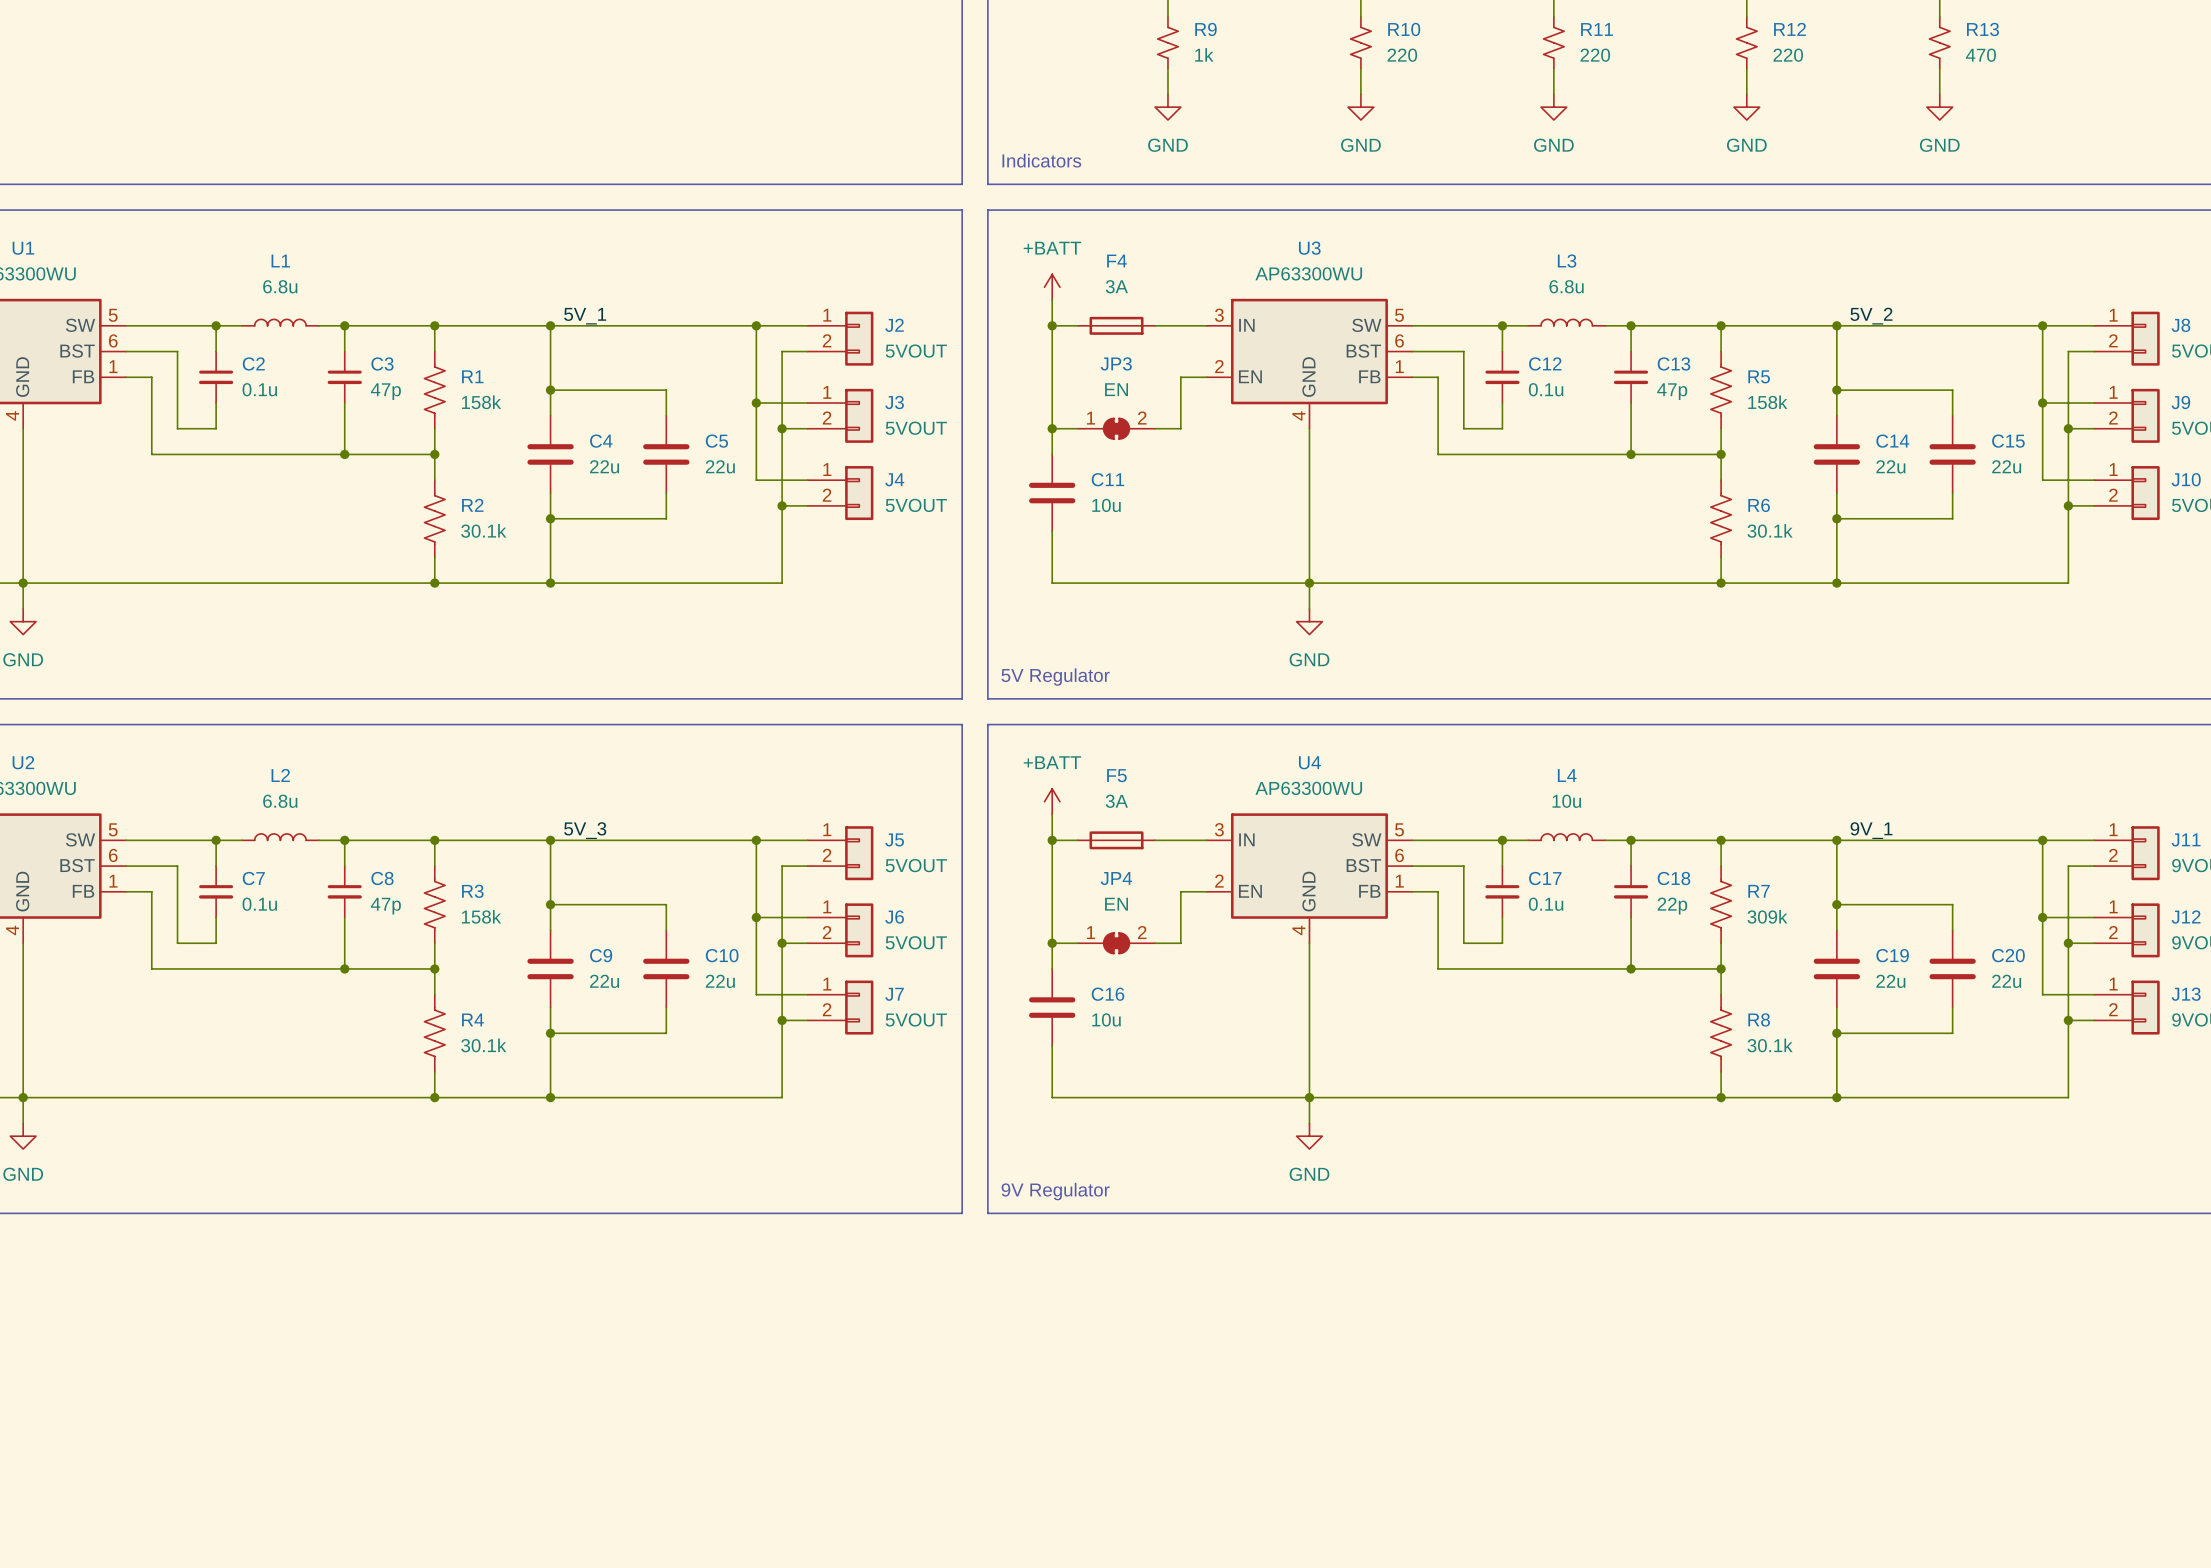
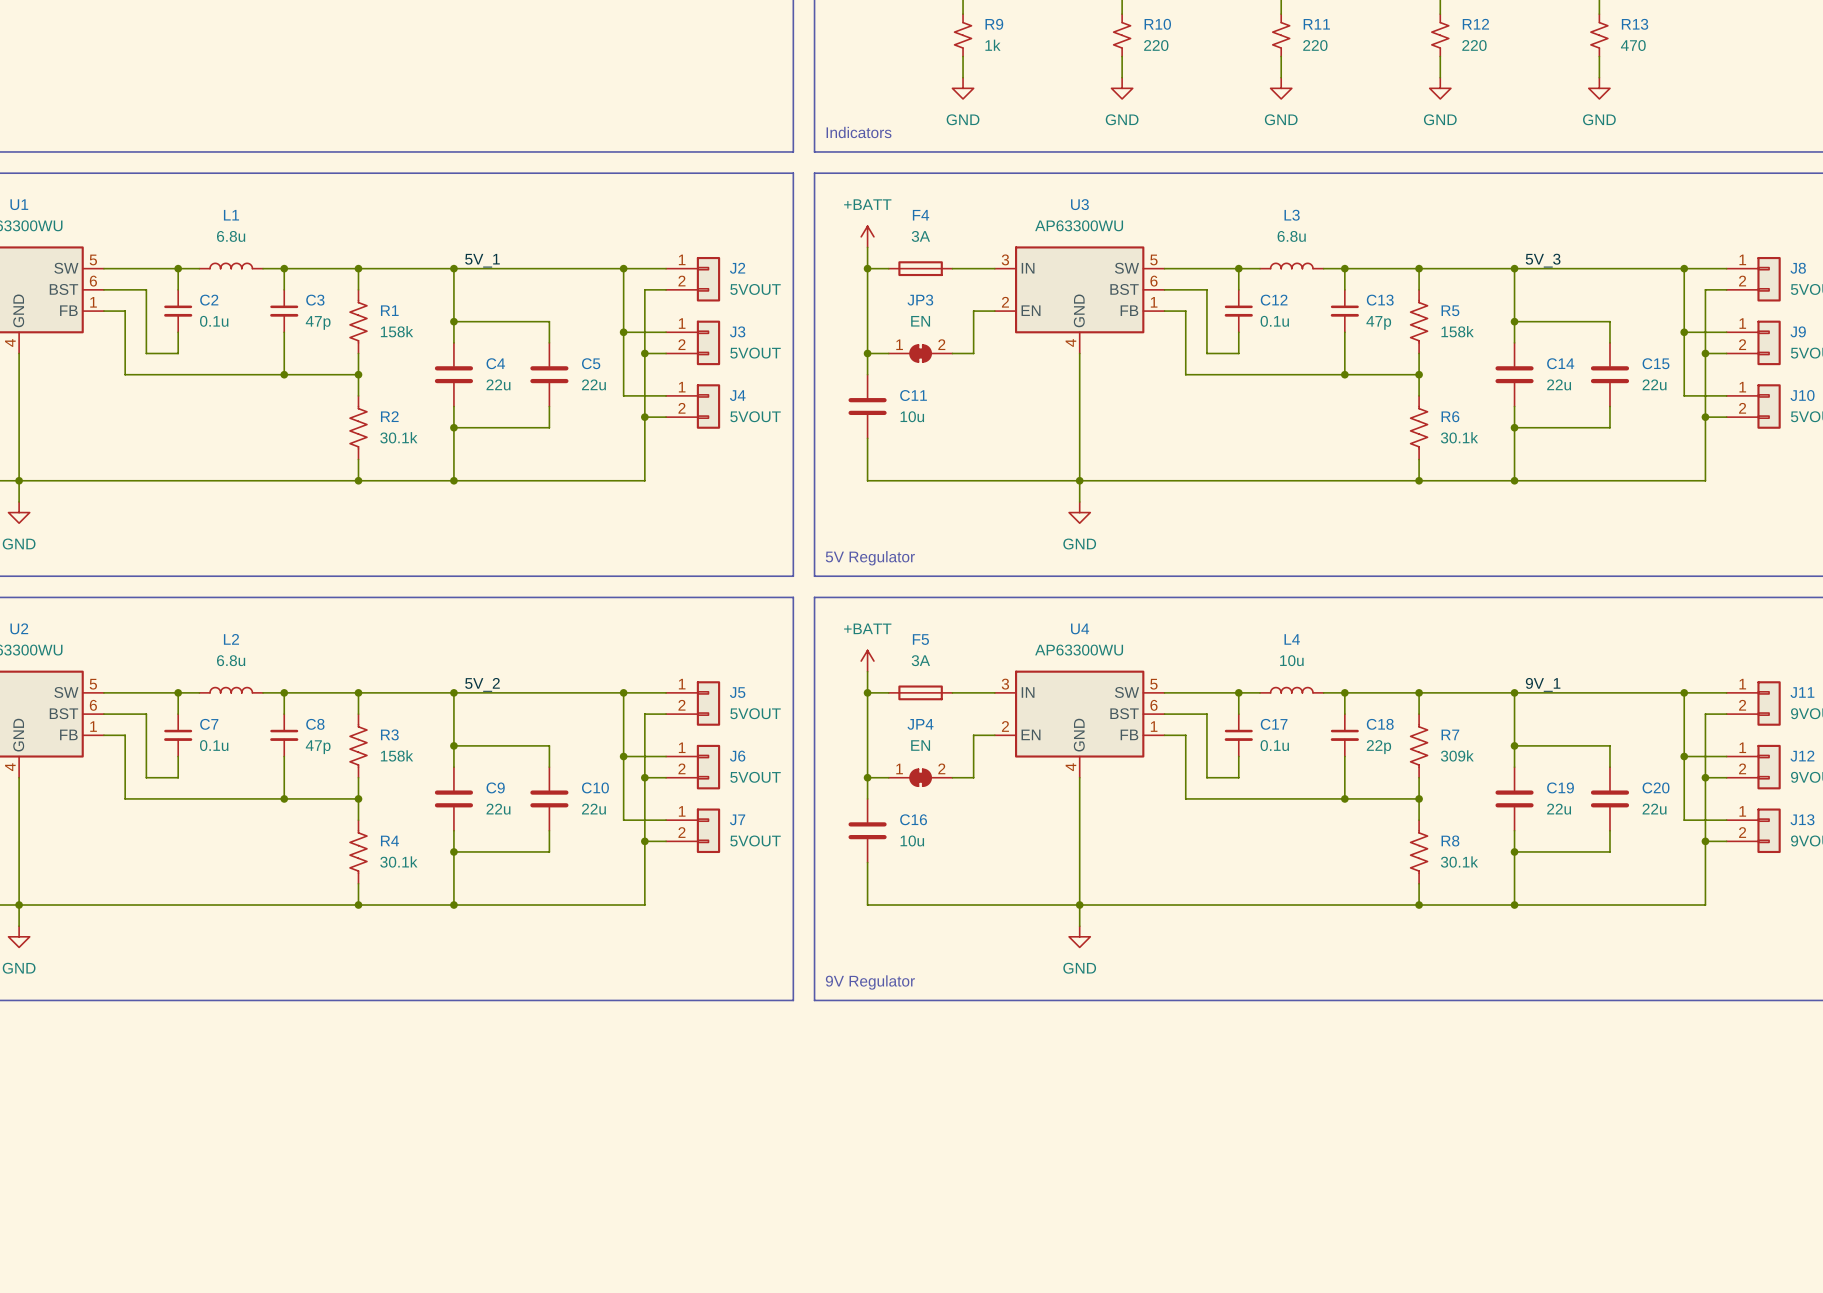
label: 5V_2 (1871, 316) -> 5V_3 (1543, 260)
label: 5V_3 (585, 830) -> 5V_2 (482, 684)

